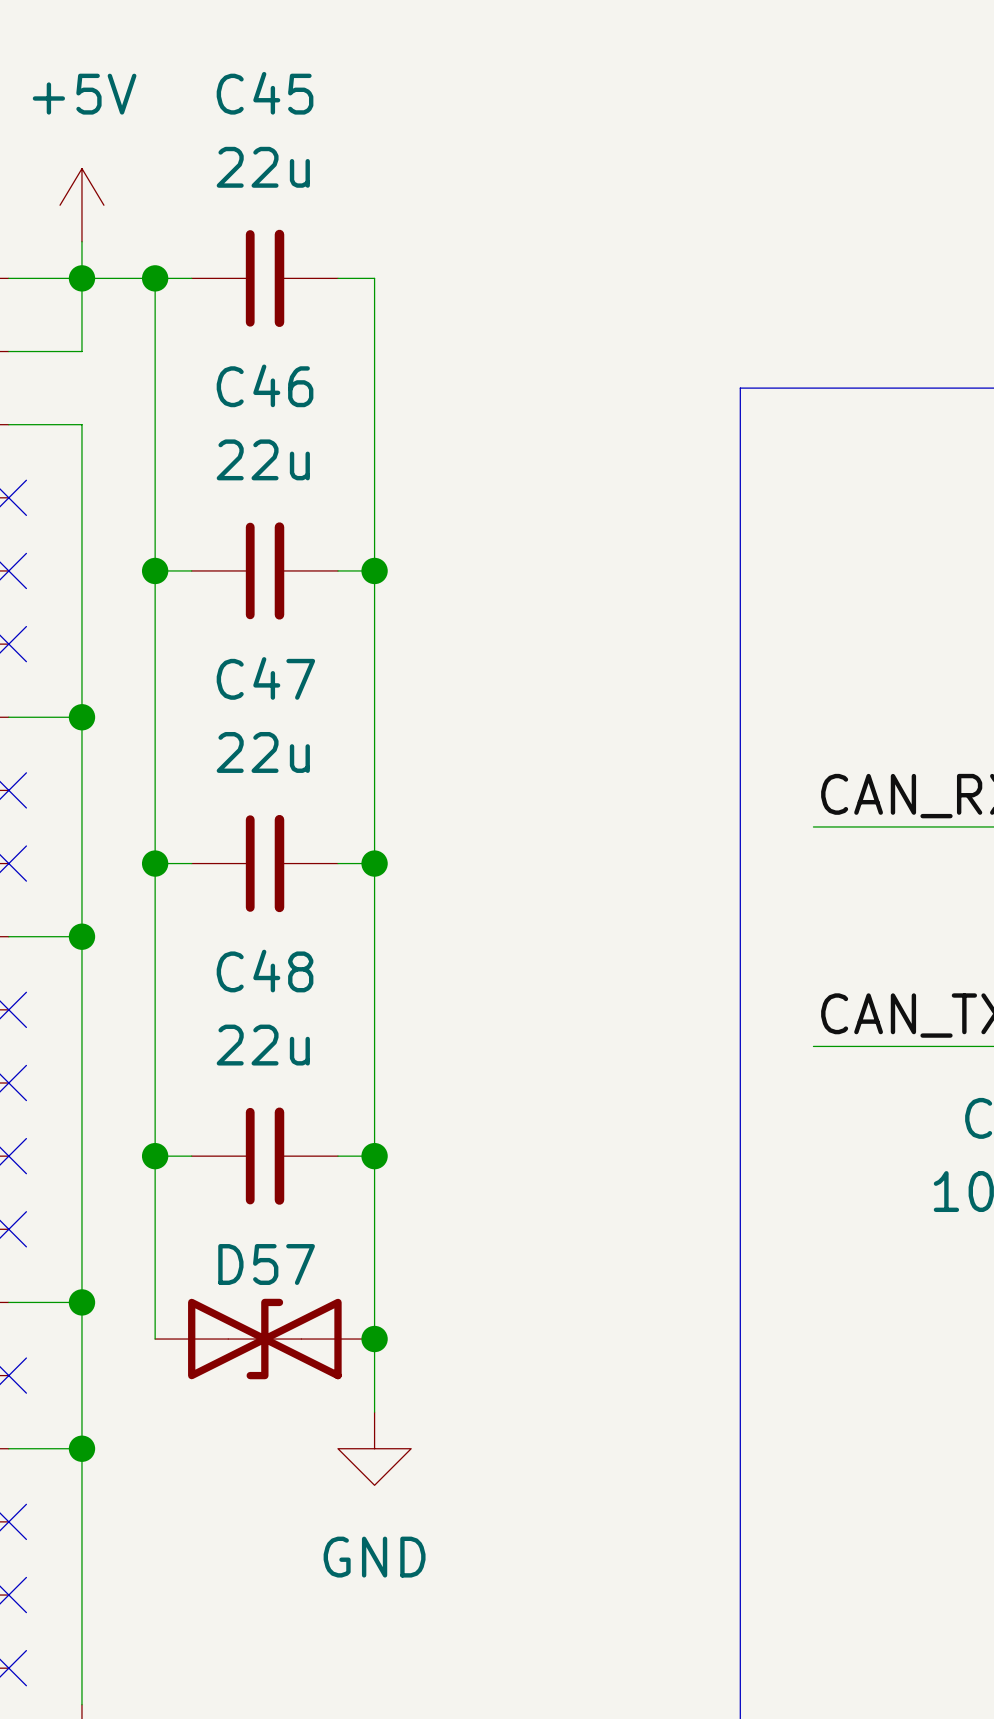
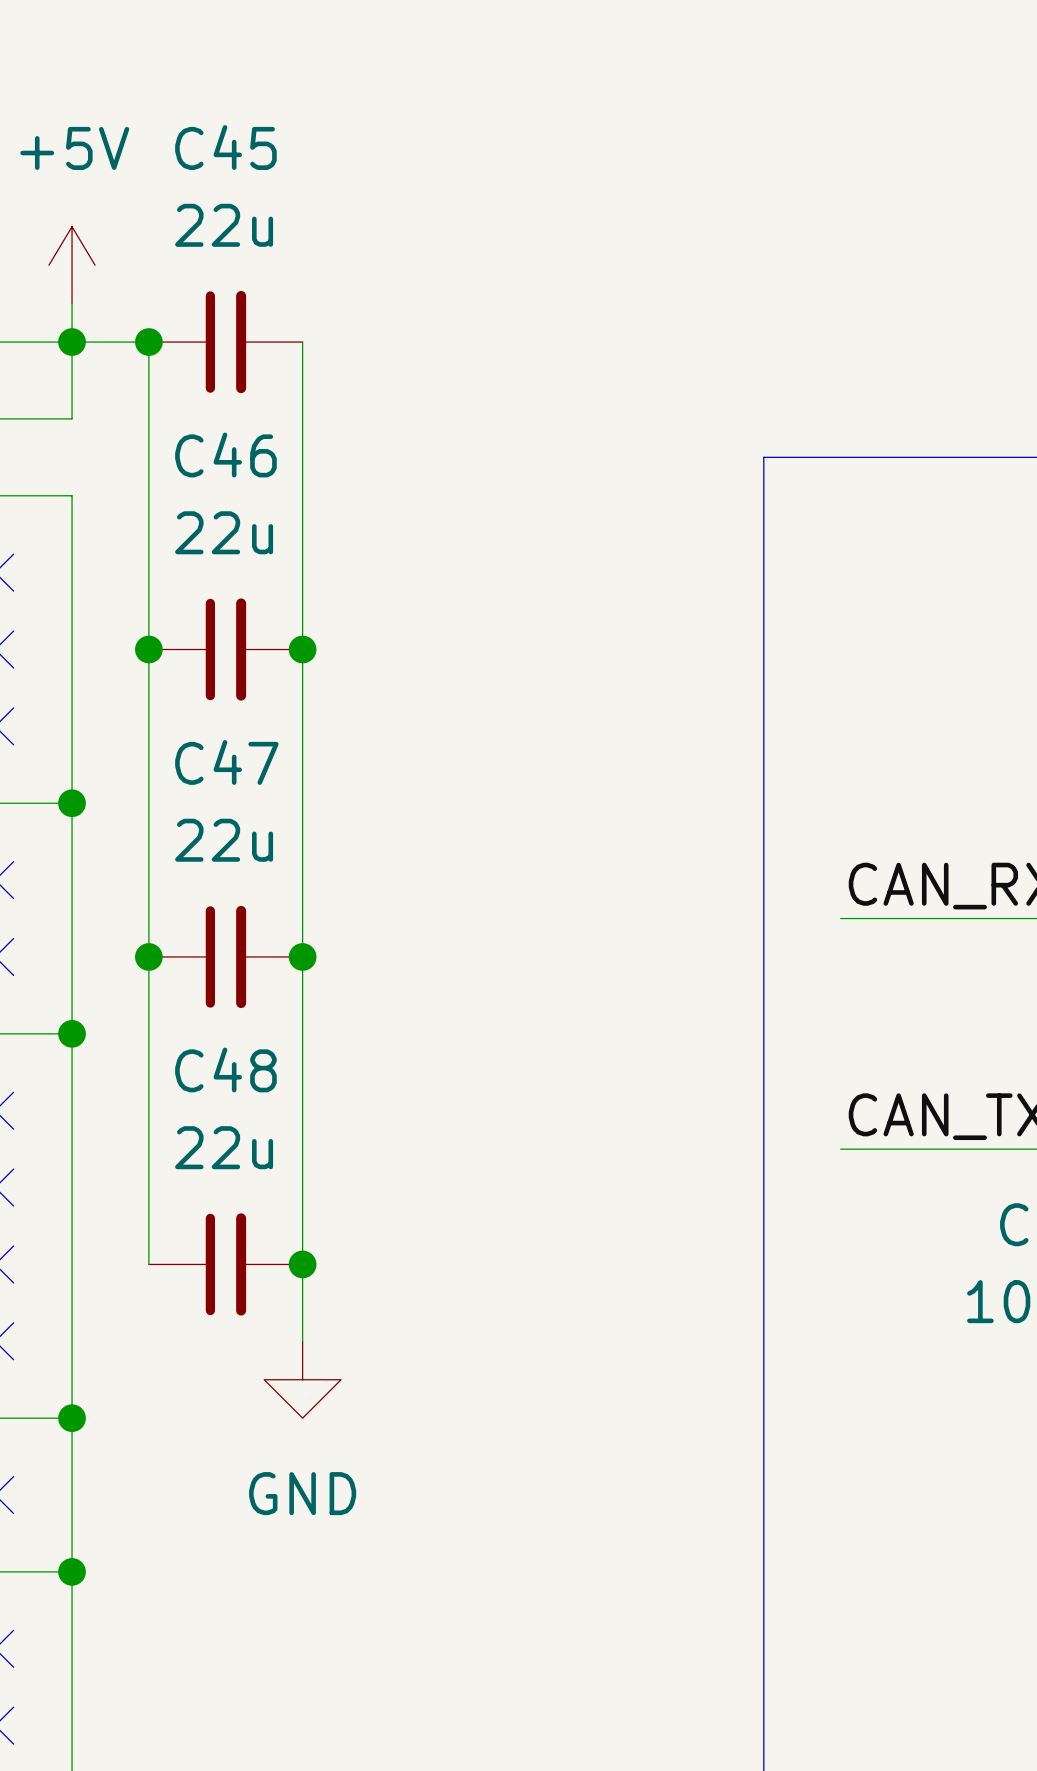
C45 position: (264, 278) -> (225, 342)
wire: none -> (302, 342) (302, 1341)
wire: (338, 278) (374, 278) (374, 1412) -> none
C46 position: (264, 570) -> (225, 649)
wire: (338, 570) (374, 570) -> none
junction position: (374, 570) -> (302, 649)
C47 position: (264, 863) -> (225, 956)
wire: (338, 863) (374, 863) -> none
junction position: (374, 863) -> (302, 956)
junction: (155, 1156) -> none
wire: (191, 1156) (155, 1156) (155, 1339) -> none
C48 position: (264, 1156) -> (225, 1264)
junction: none -> (302, 1264)
wire: (338, 1156) (374, 1156) -> none
junction: (374, 1156) -> none
D57: (264, 1339) -> none
junction: (374, 1339) -> none
power symbol position: GND (374, 1448) -> GND (302, 1379)

